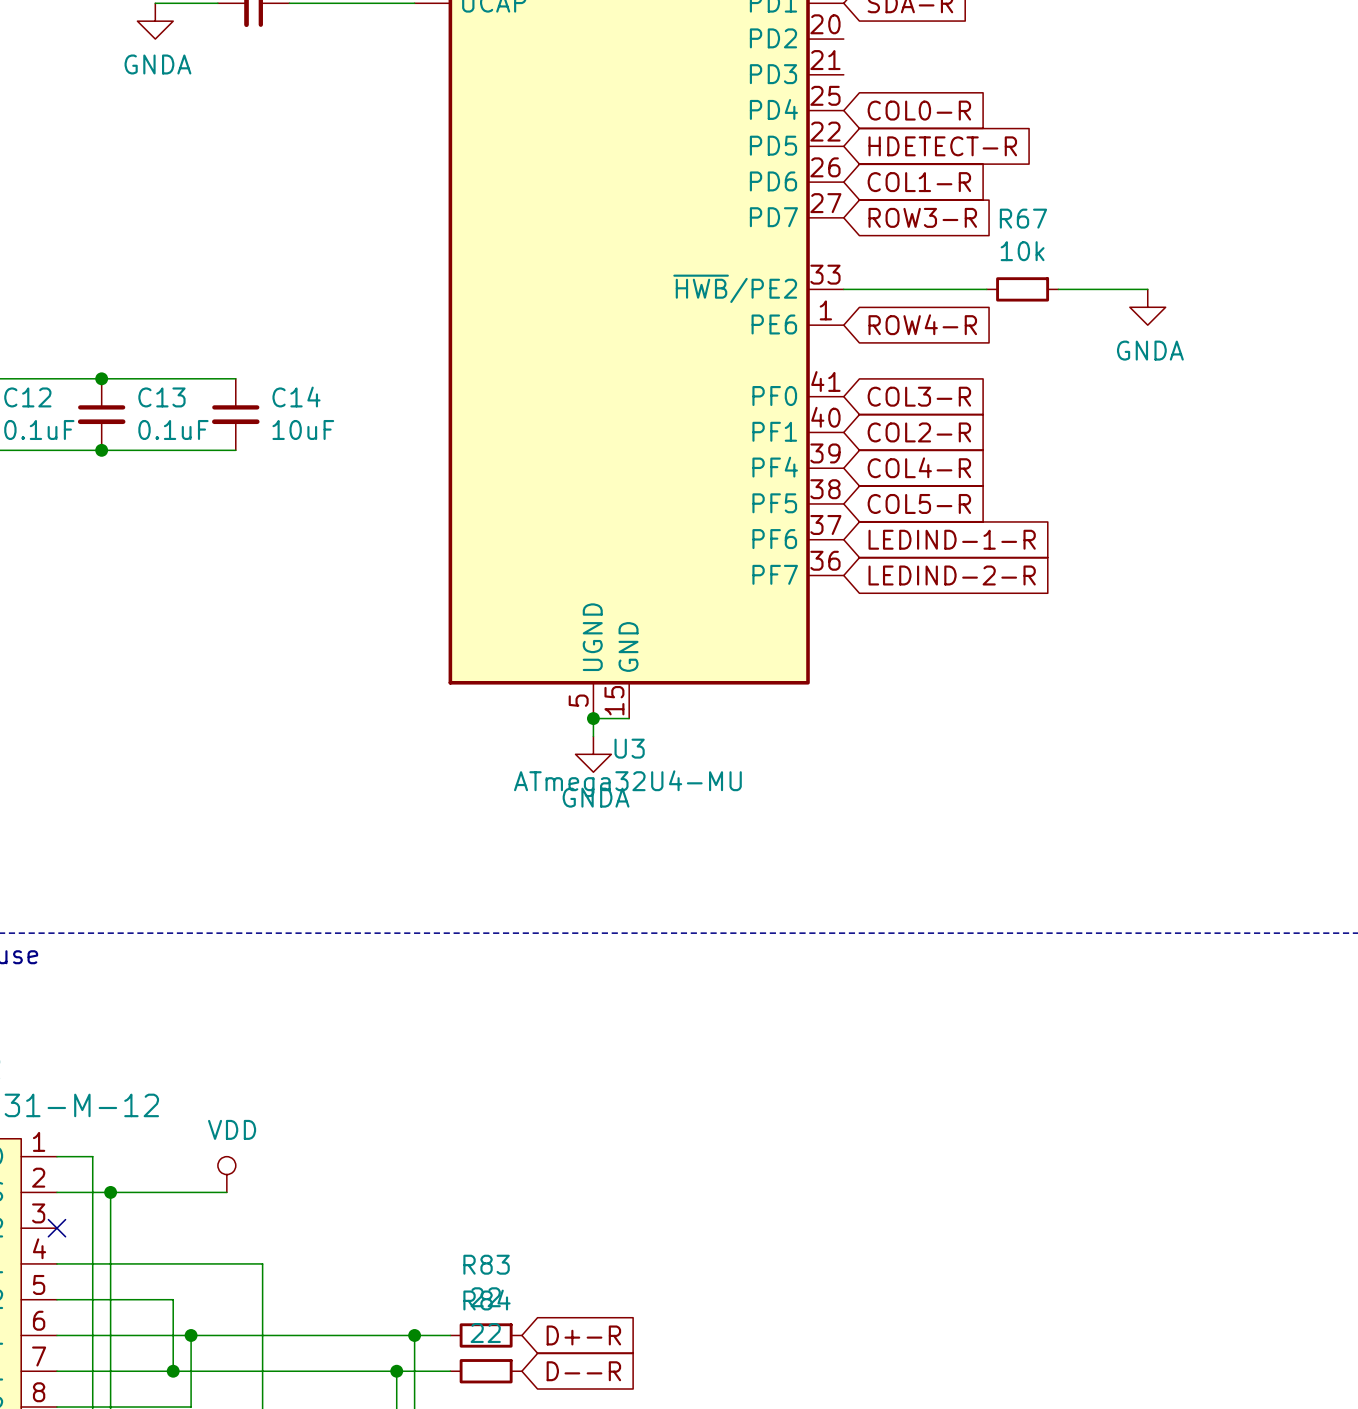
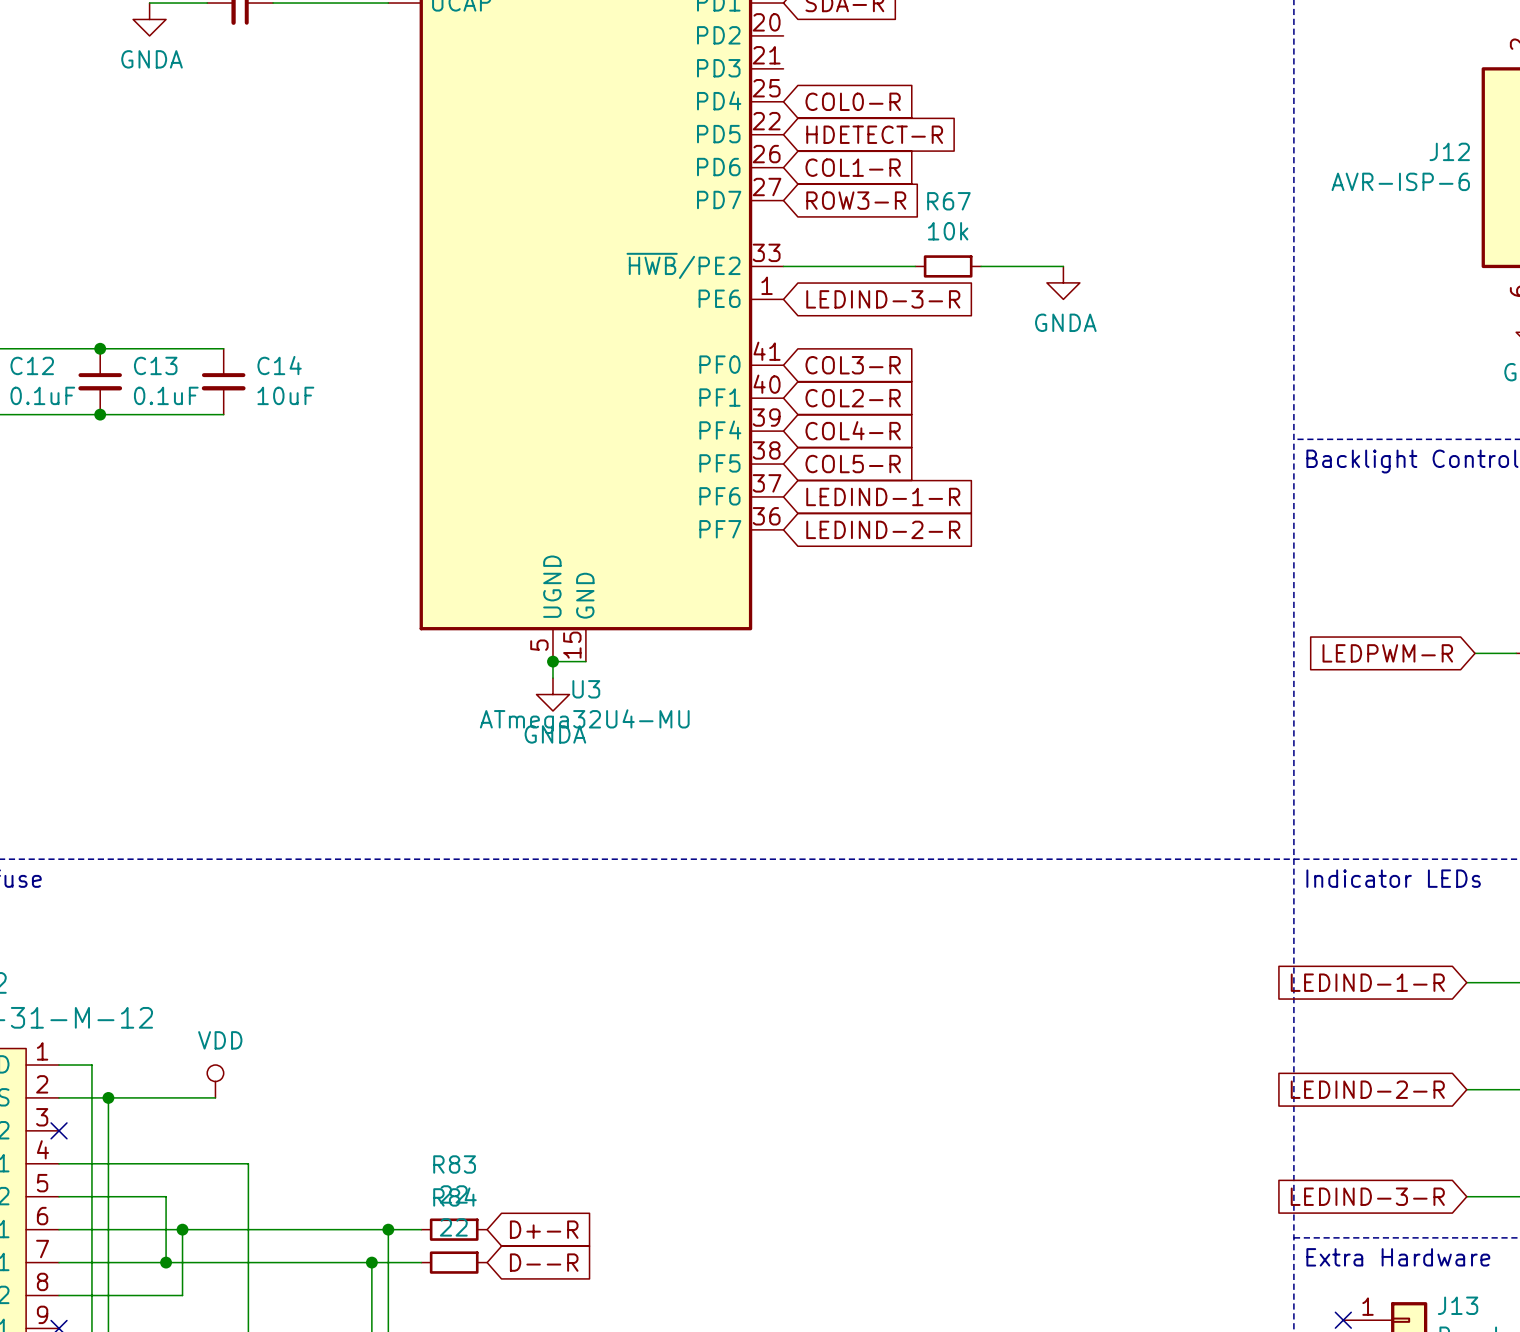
global label: ROW4-R (922, 324) -> LEDIND-3-R (883, 299)

